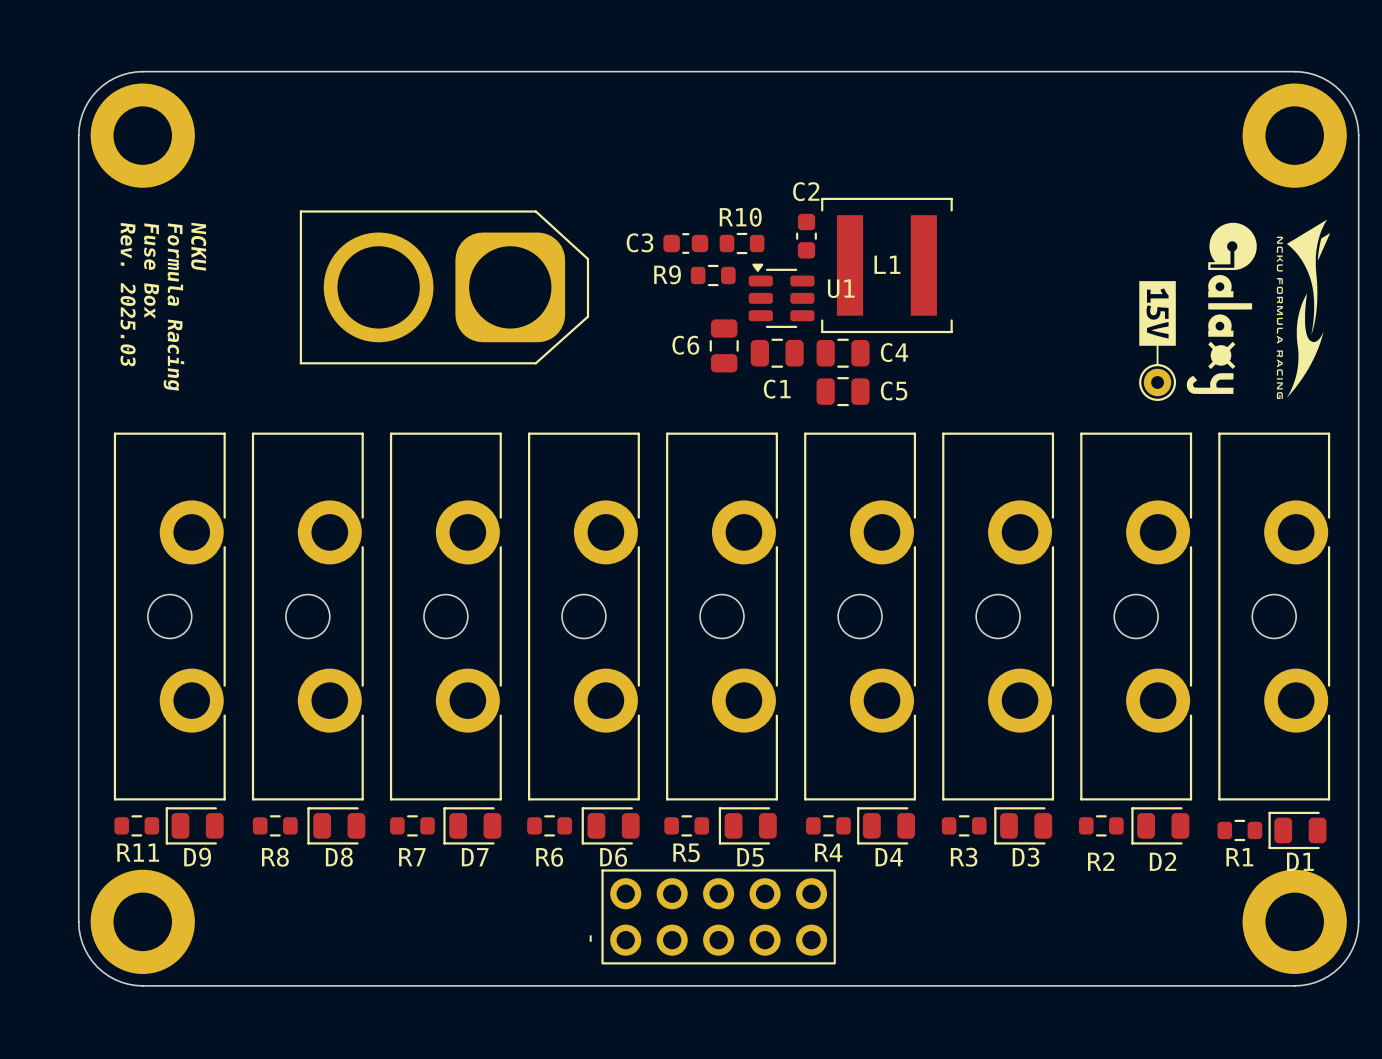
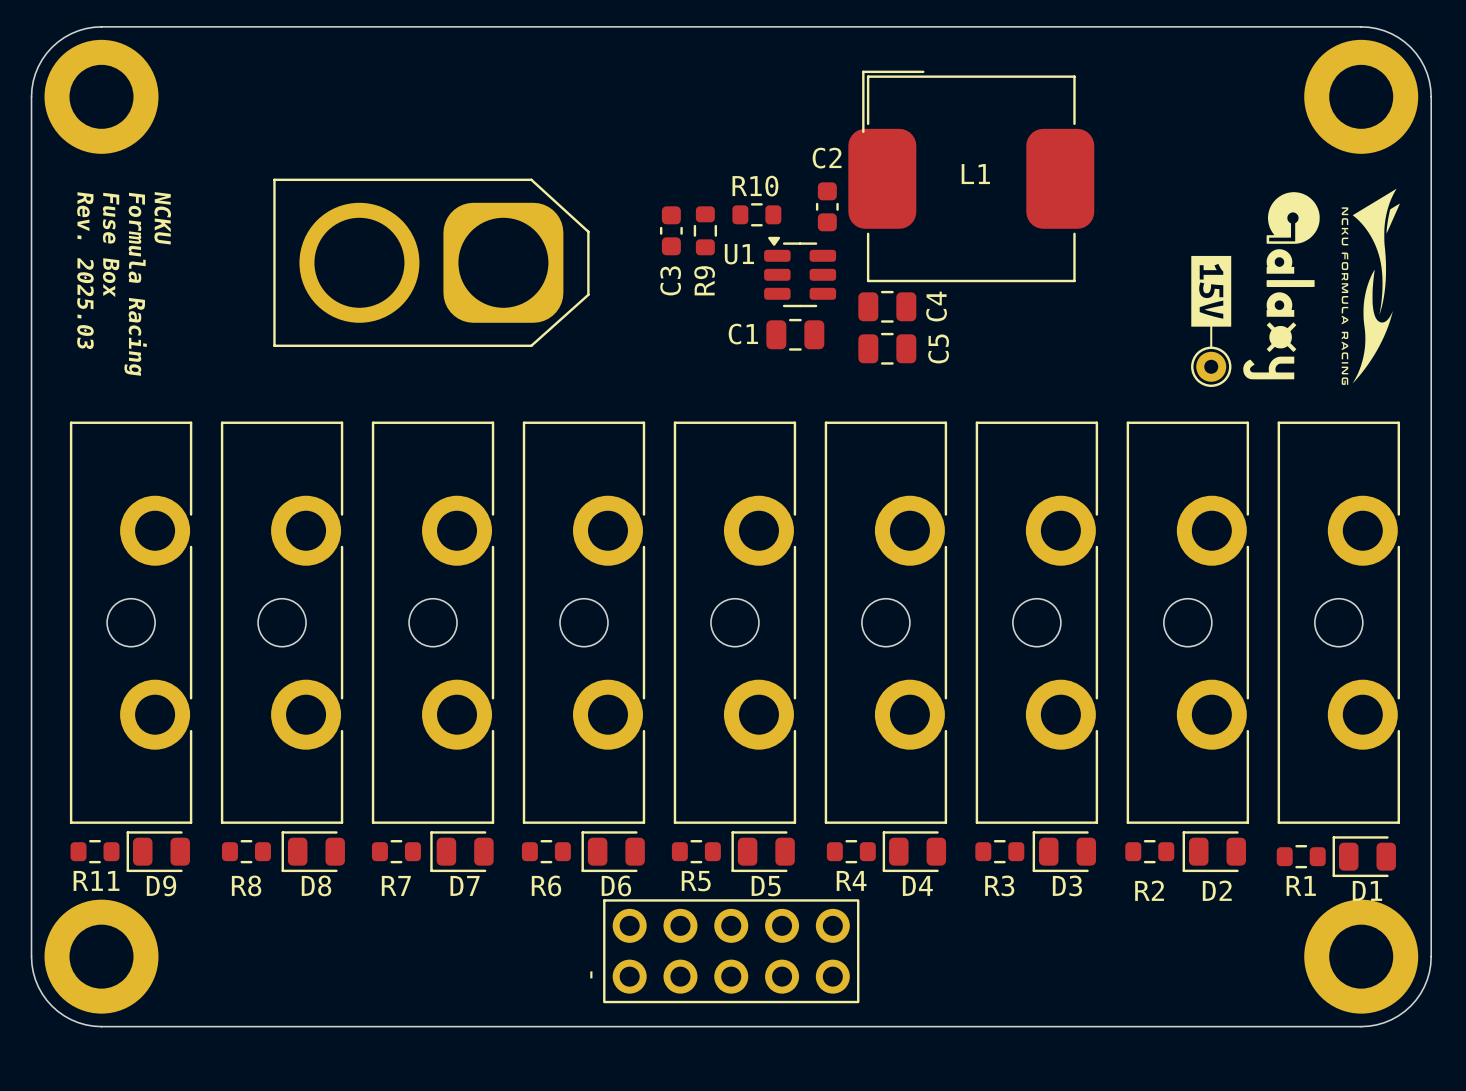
L1 footprint: [821, 197, 953, 334] -> [848, 70, 1095, 283]
C3 name position: C3 (640, 242) -> C3 (670, 280)
C3 rotation: 0° (685, 243) -> 90° clockwise (671, 230)
R9 name position: R9 (667, 274) -> R9 (704, 280)
R9 rotation: 0° (713, 275) -> 90° clockwise (705, 230)
U1 name position: U1 (841, 288) -> U1 (739, 254)
C6: (724, 345) -> none
C4 name rotation: 0° (894, 352) -> 90° counterclockwise (936, 306)
C4 position: (843, 353) -> (887, 306)
C1 name position: C1 (777, 389) -> C1 (743, 334)
C5 name rotation: 0° (894, 390) -> 90° counterclockwise (938, 348)
C5 position: (843, 391) -> (887, 348)

